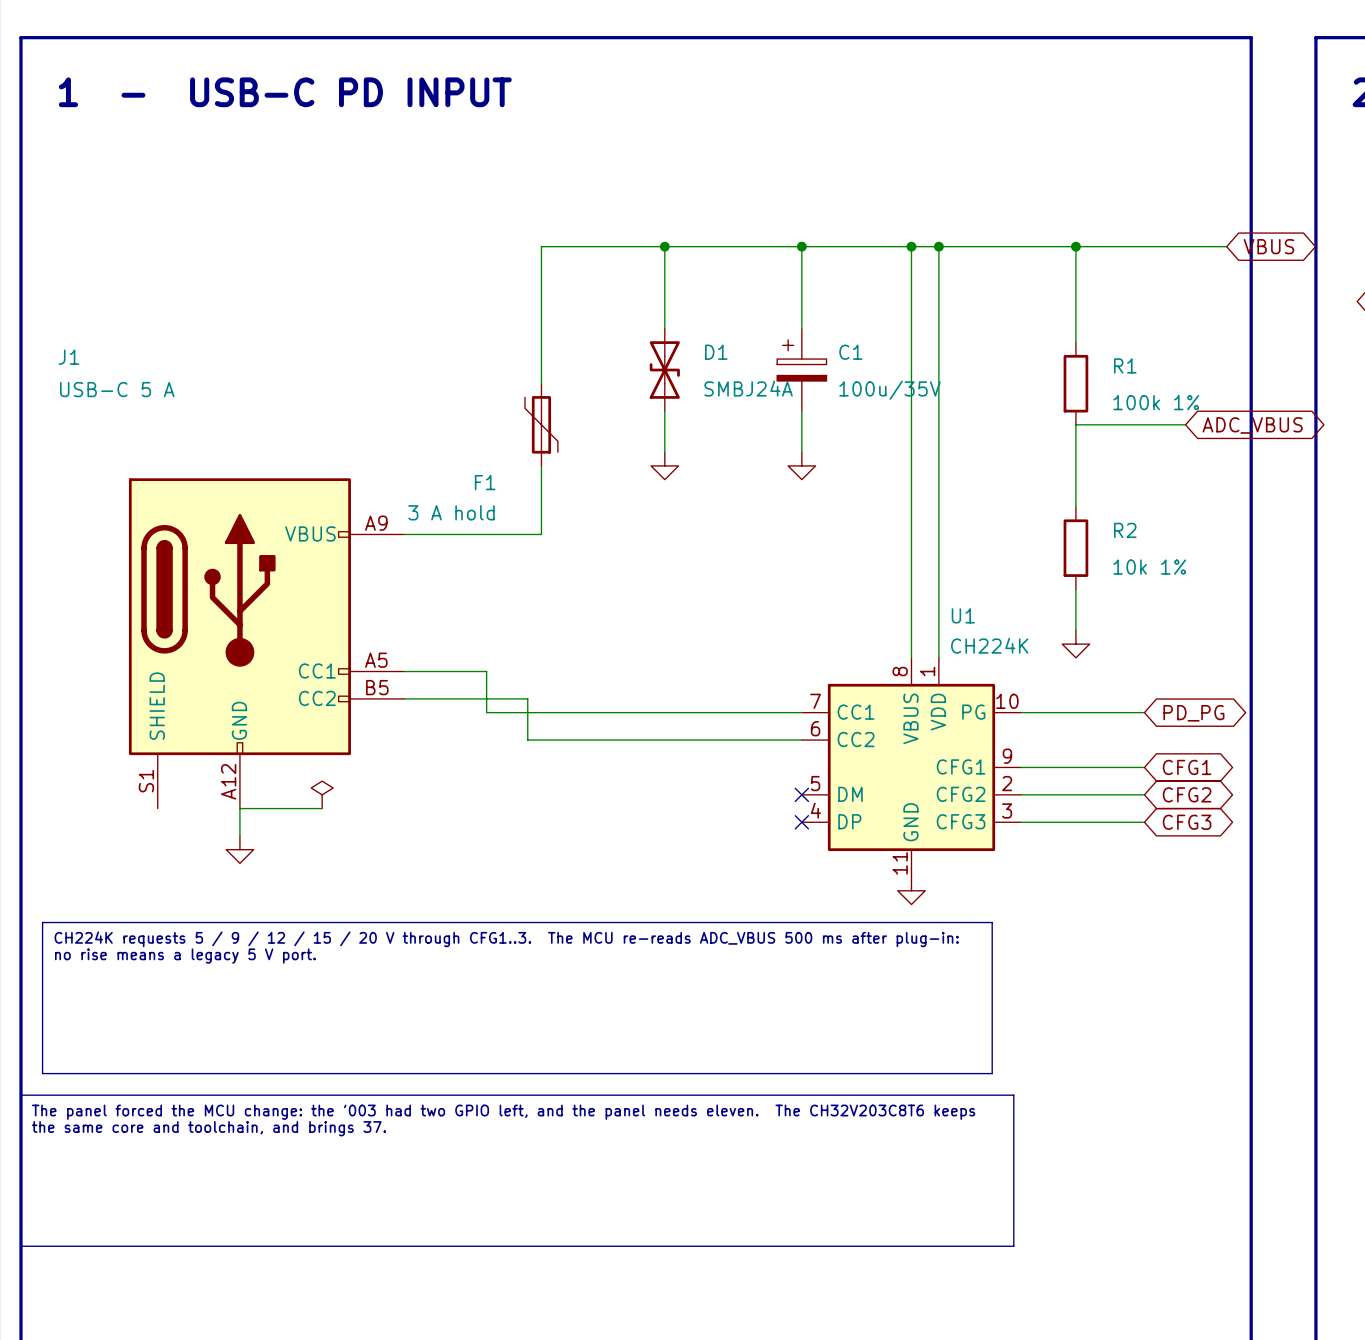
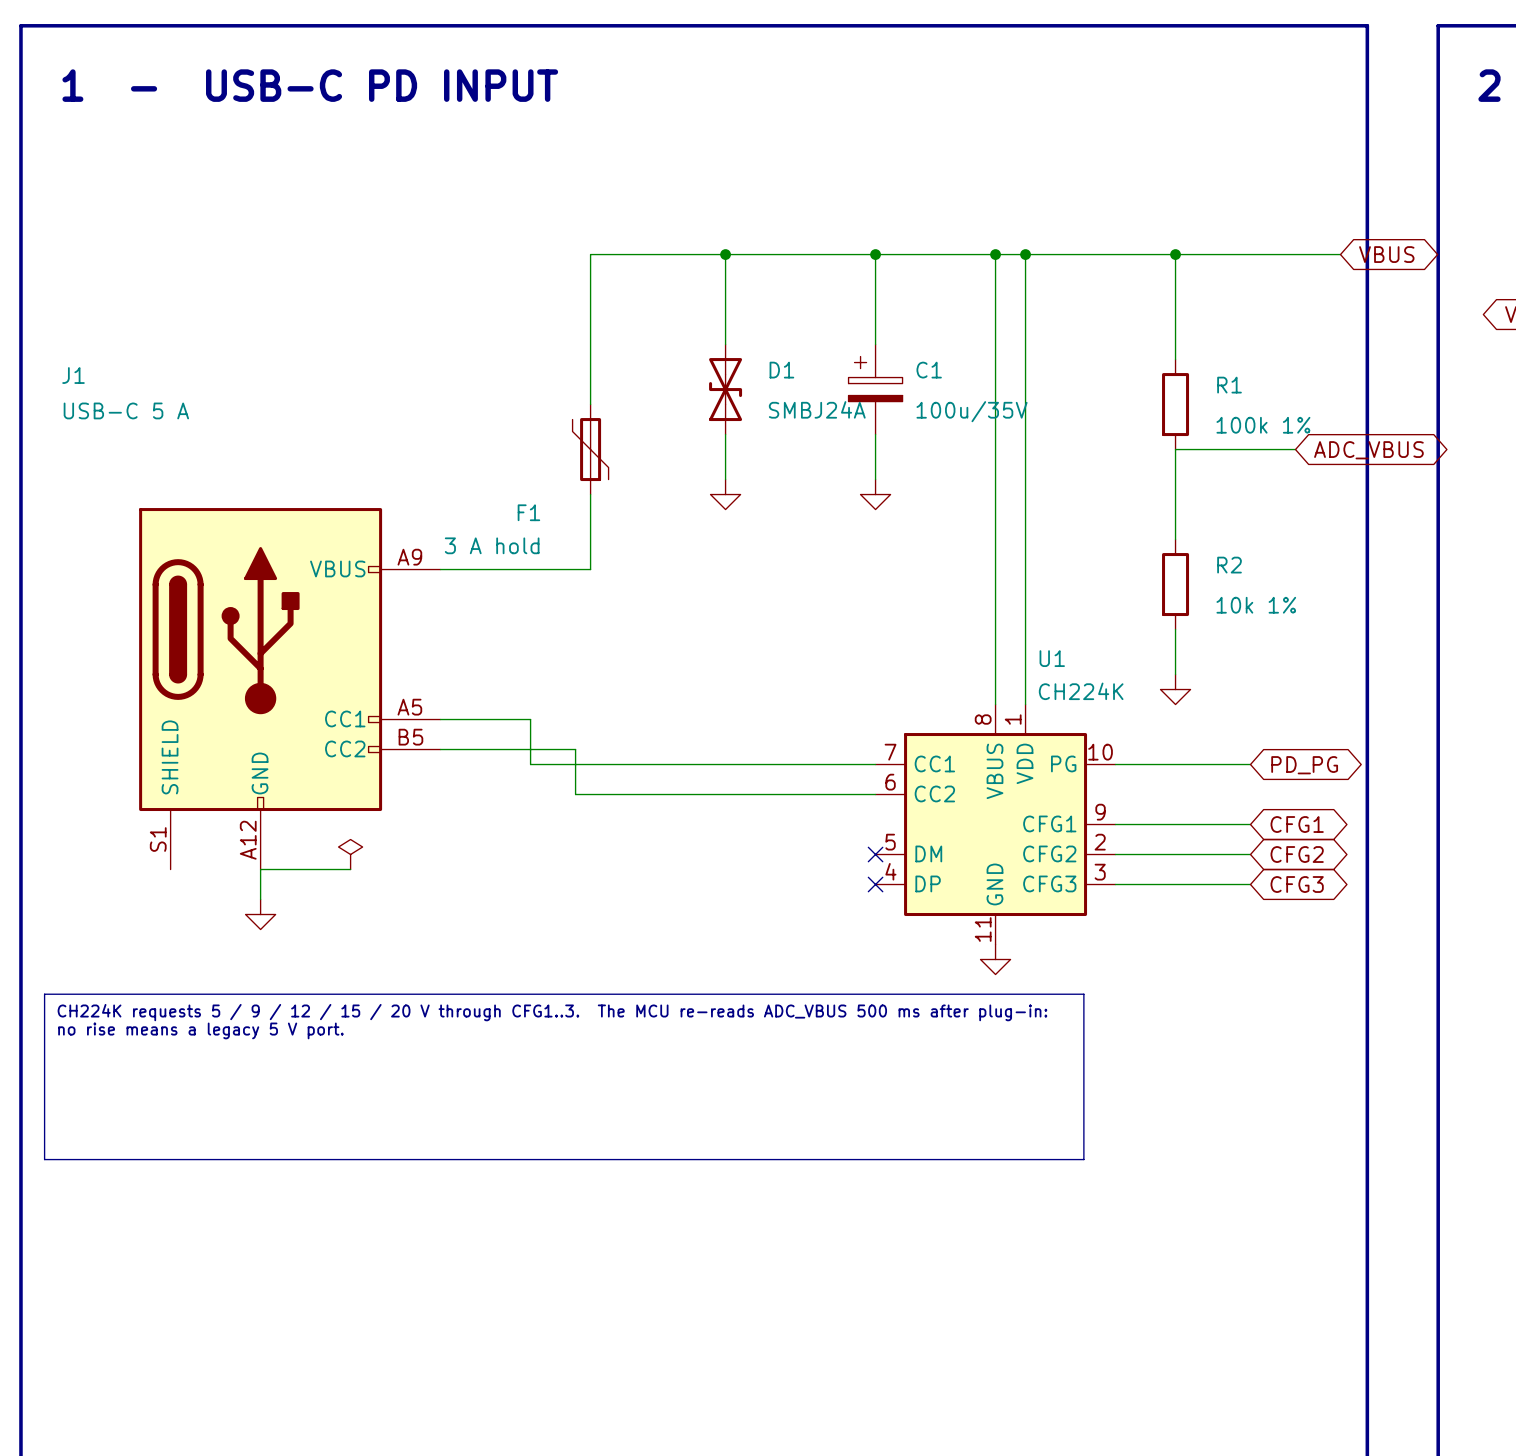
line: (20, 1095) (1013, 1095) (1013, 1246) (20, 1246) (20, 1095) -> none
text: The panel forced the MCU change: the '003 had two GPIO left, and the panel needs eleven. The CH32V203C8T6 keeps (503, 1112) -> none
text: the same core and toolchain, and brings 37. (208, 1128) -> none

